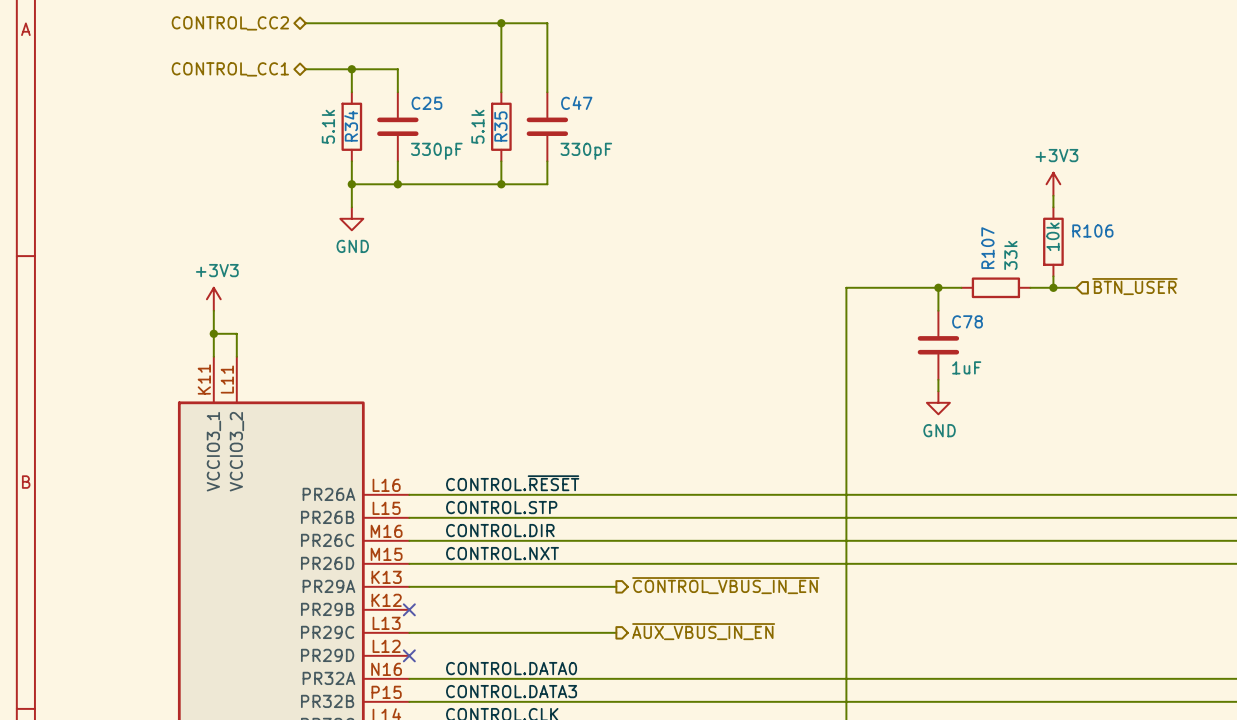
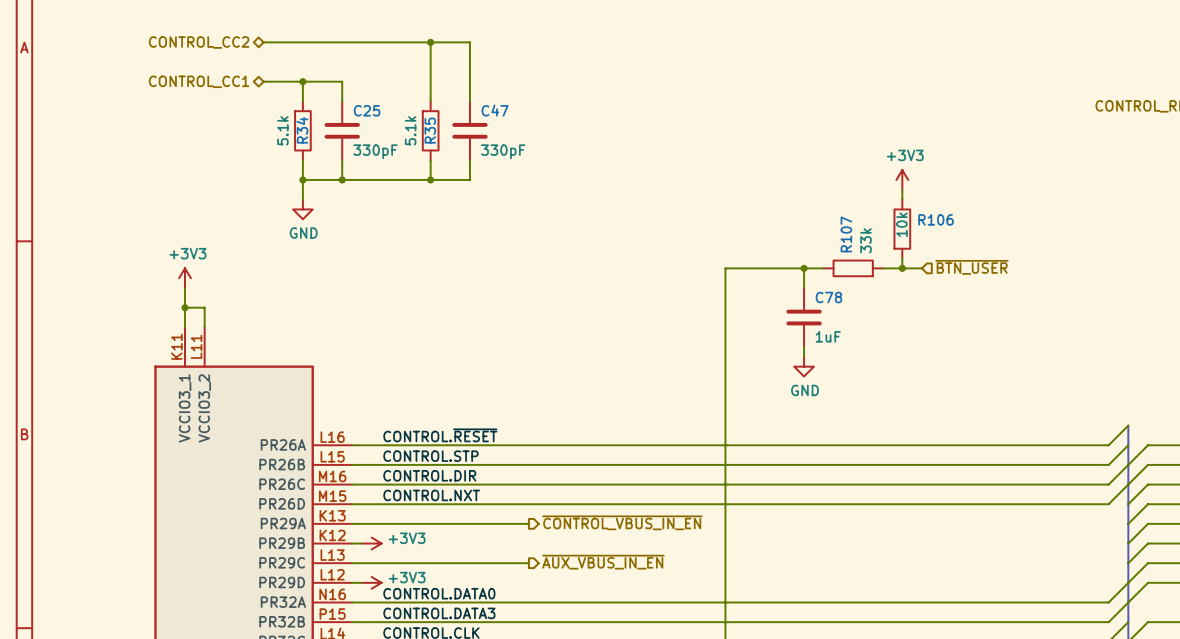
wire: none -> (352, 543) (361, 543)
no-connect mark: (409, 609) -> none
power symbol: none -> +3V3 (371, 543)
wire: none -> (352, 582) (361, 582)
no-connect mark: (409, 655) -> none
power symbol: none -> +3V3 (371, 582)

